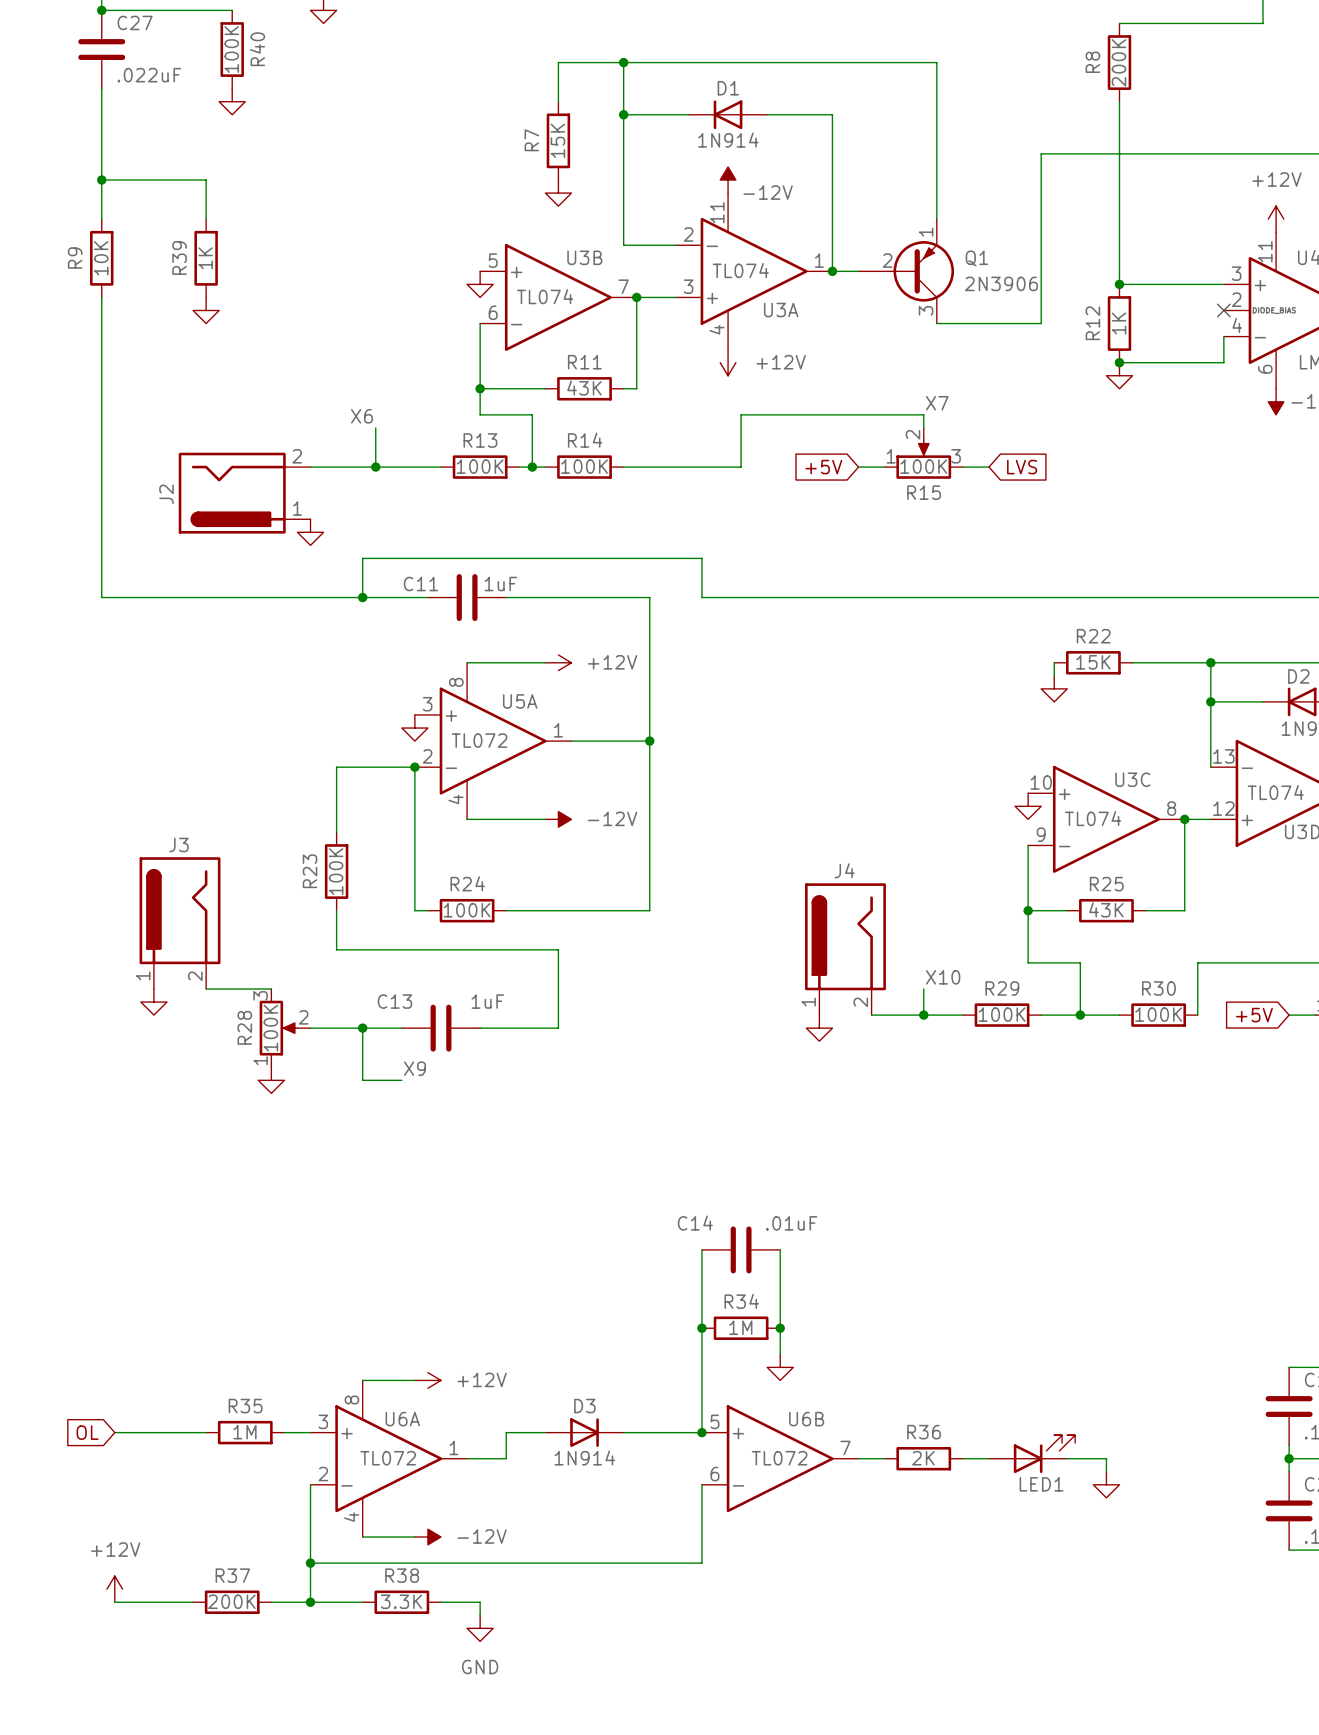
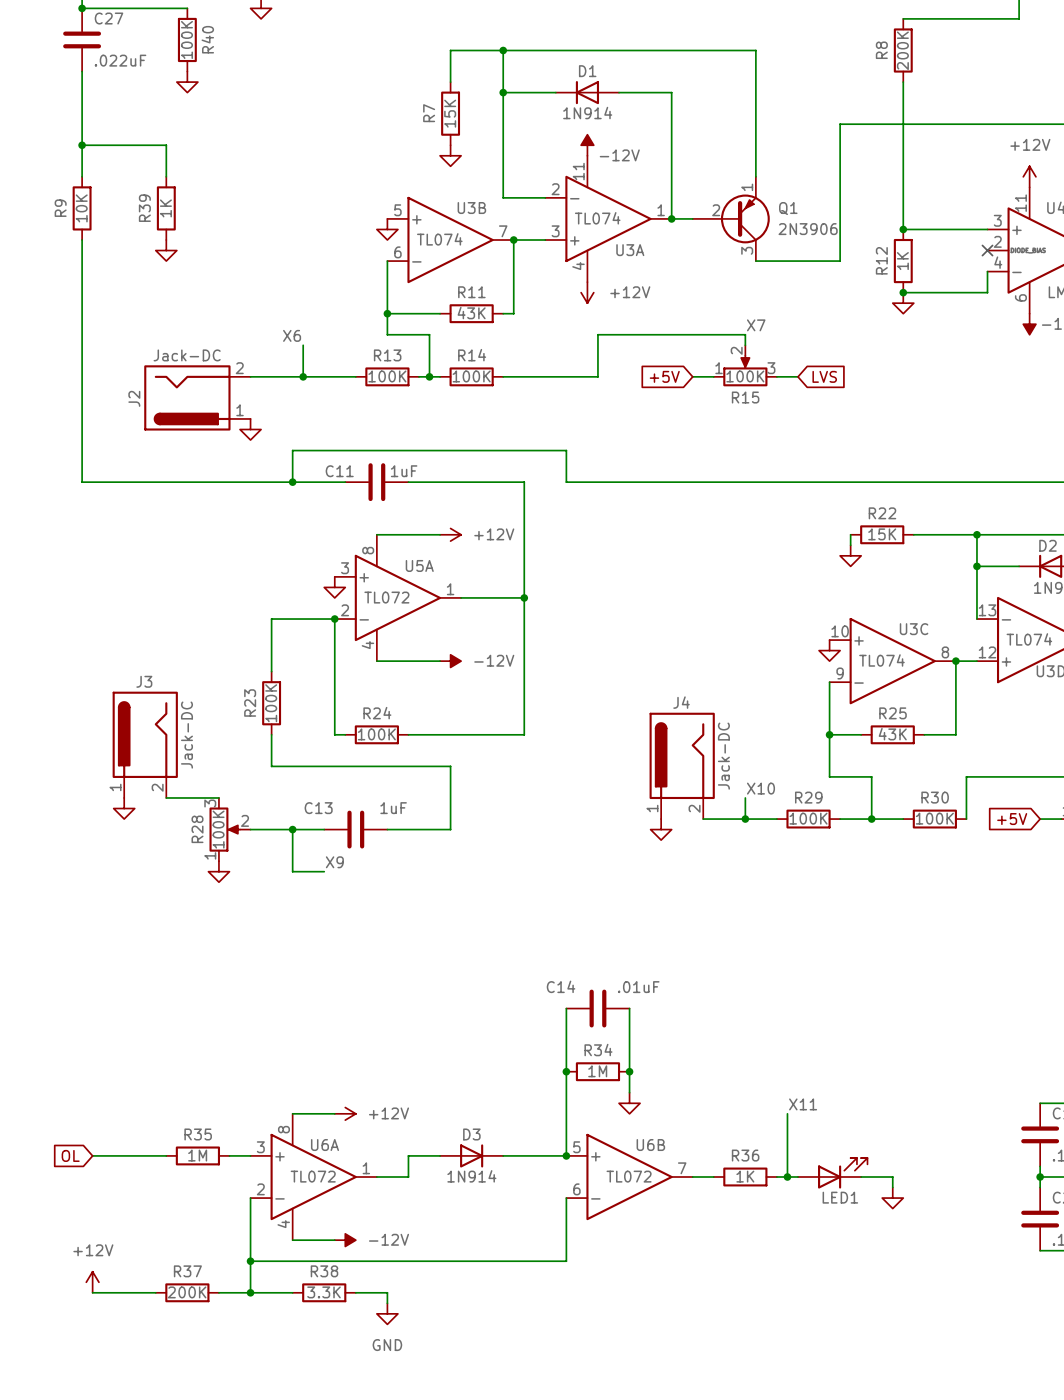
J2 value: none -> Jack-DC (187, 355)
J3 value: none -> Jack-DC (186, 735)
J4 value: none -> Jack-DC (723, 756)
label: none -> X11 (803, 1104)
wire: none -> (787, 1113) (787, 1176)
R36 value: 2K (923, 1458) -> 1K (745, 1176)
junction: none -> (787, 1176)

